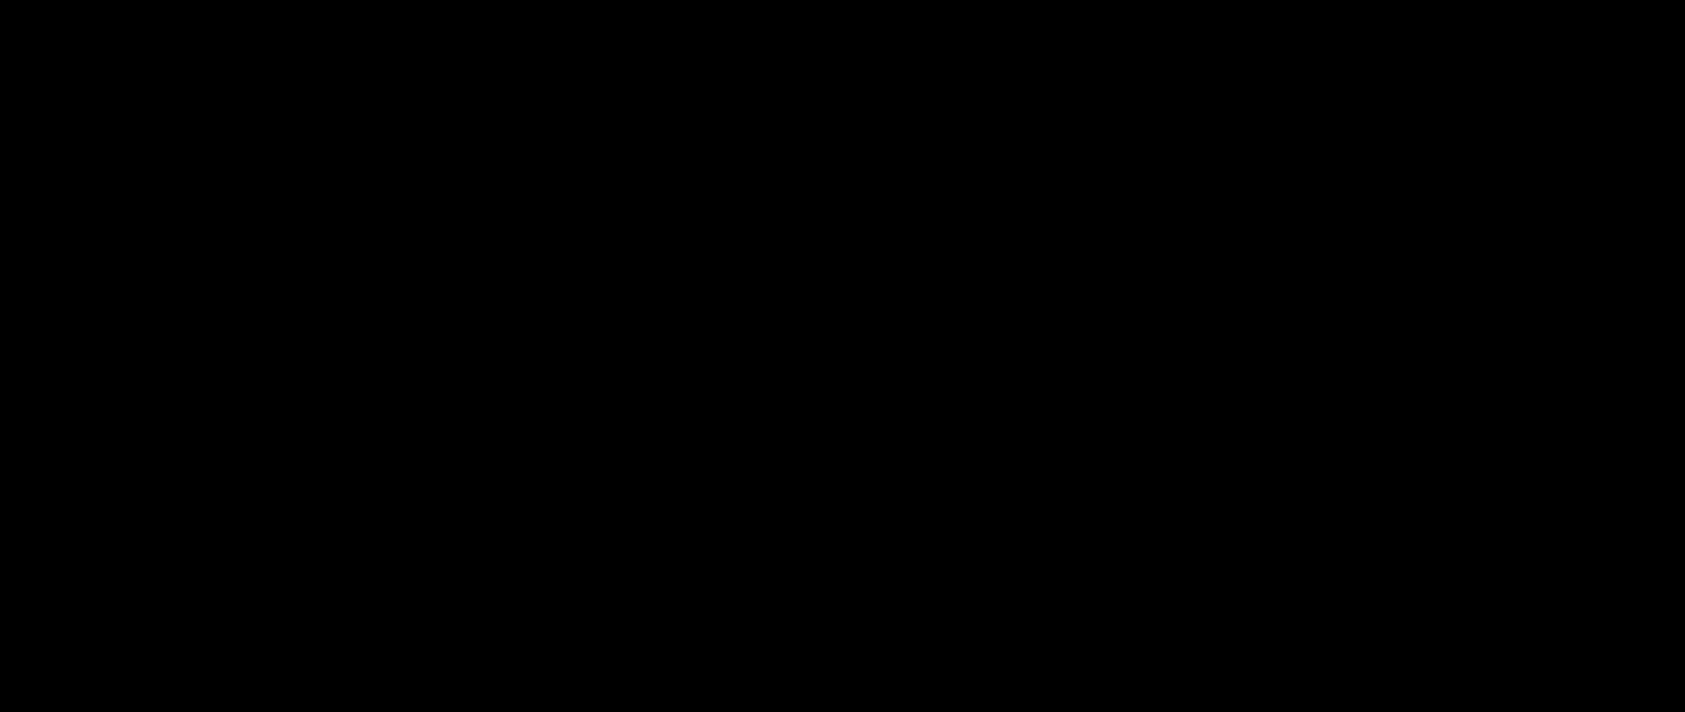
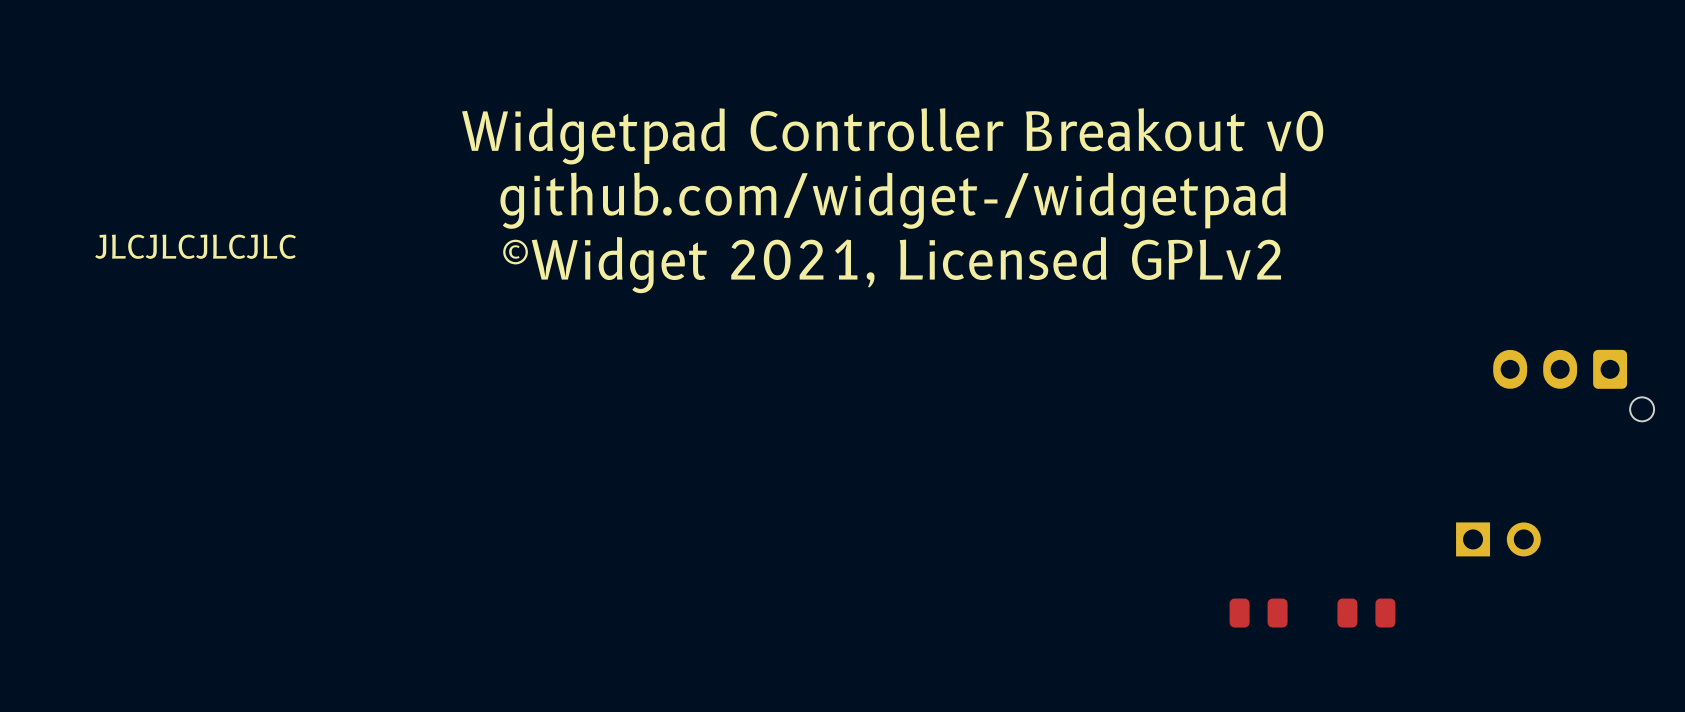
text: none -> Widgetpad Controller Breakout v0 (892, 136)
text: none -> github.com/widget-/widgetpad (893, 200)
text: none -> JLCJLCJLCJLC (195, 246)
text: none -> ©Widget 2021, Licensed GPLv2 (892, 265)
part: none -> (1573, 385)
part: none -> (1498, 539)
part: none -> (1258, 613)
part: none -> (1366, 613)

